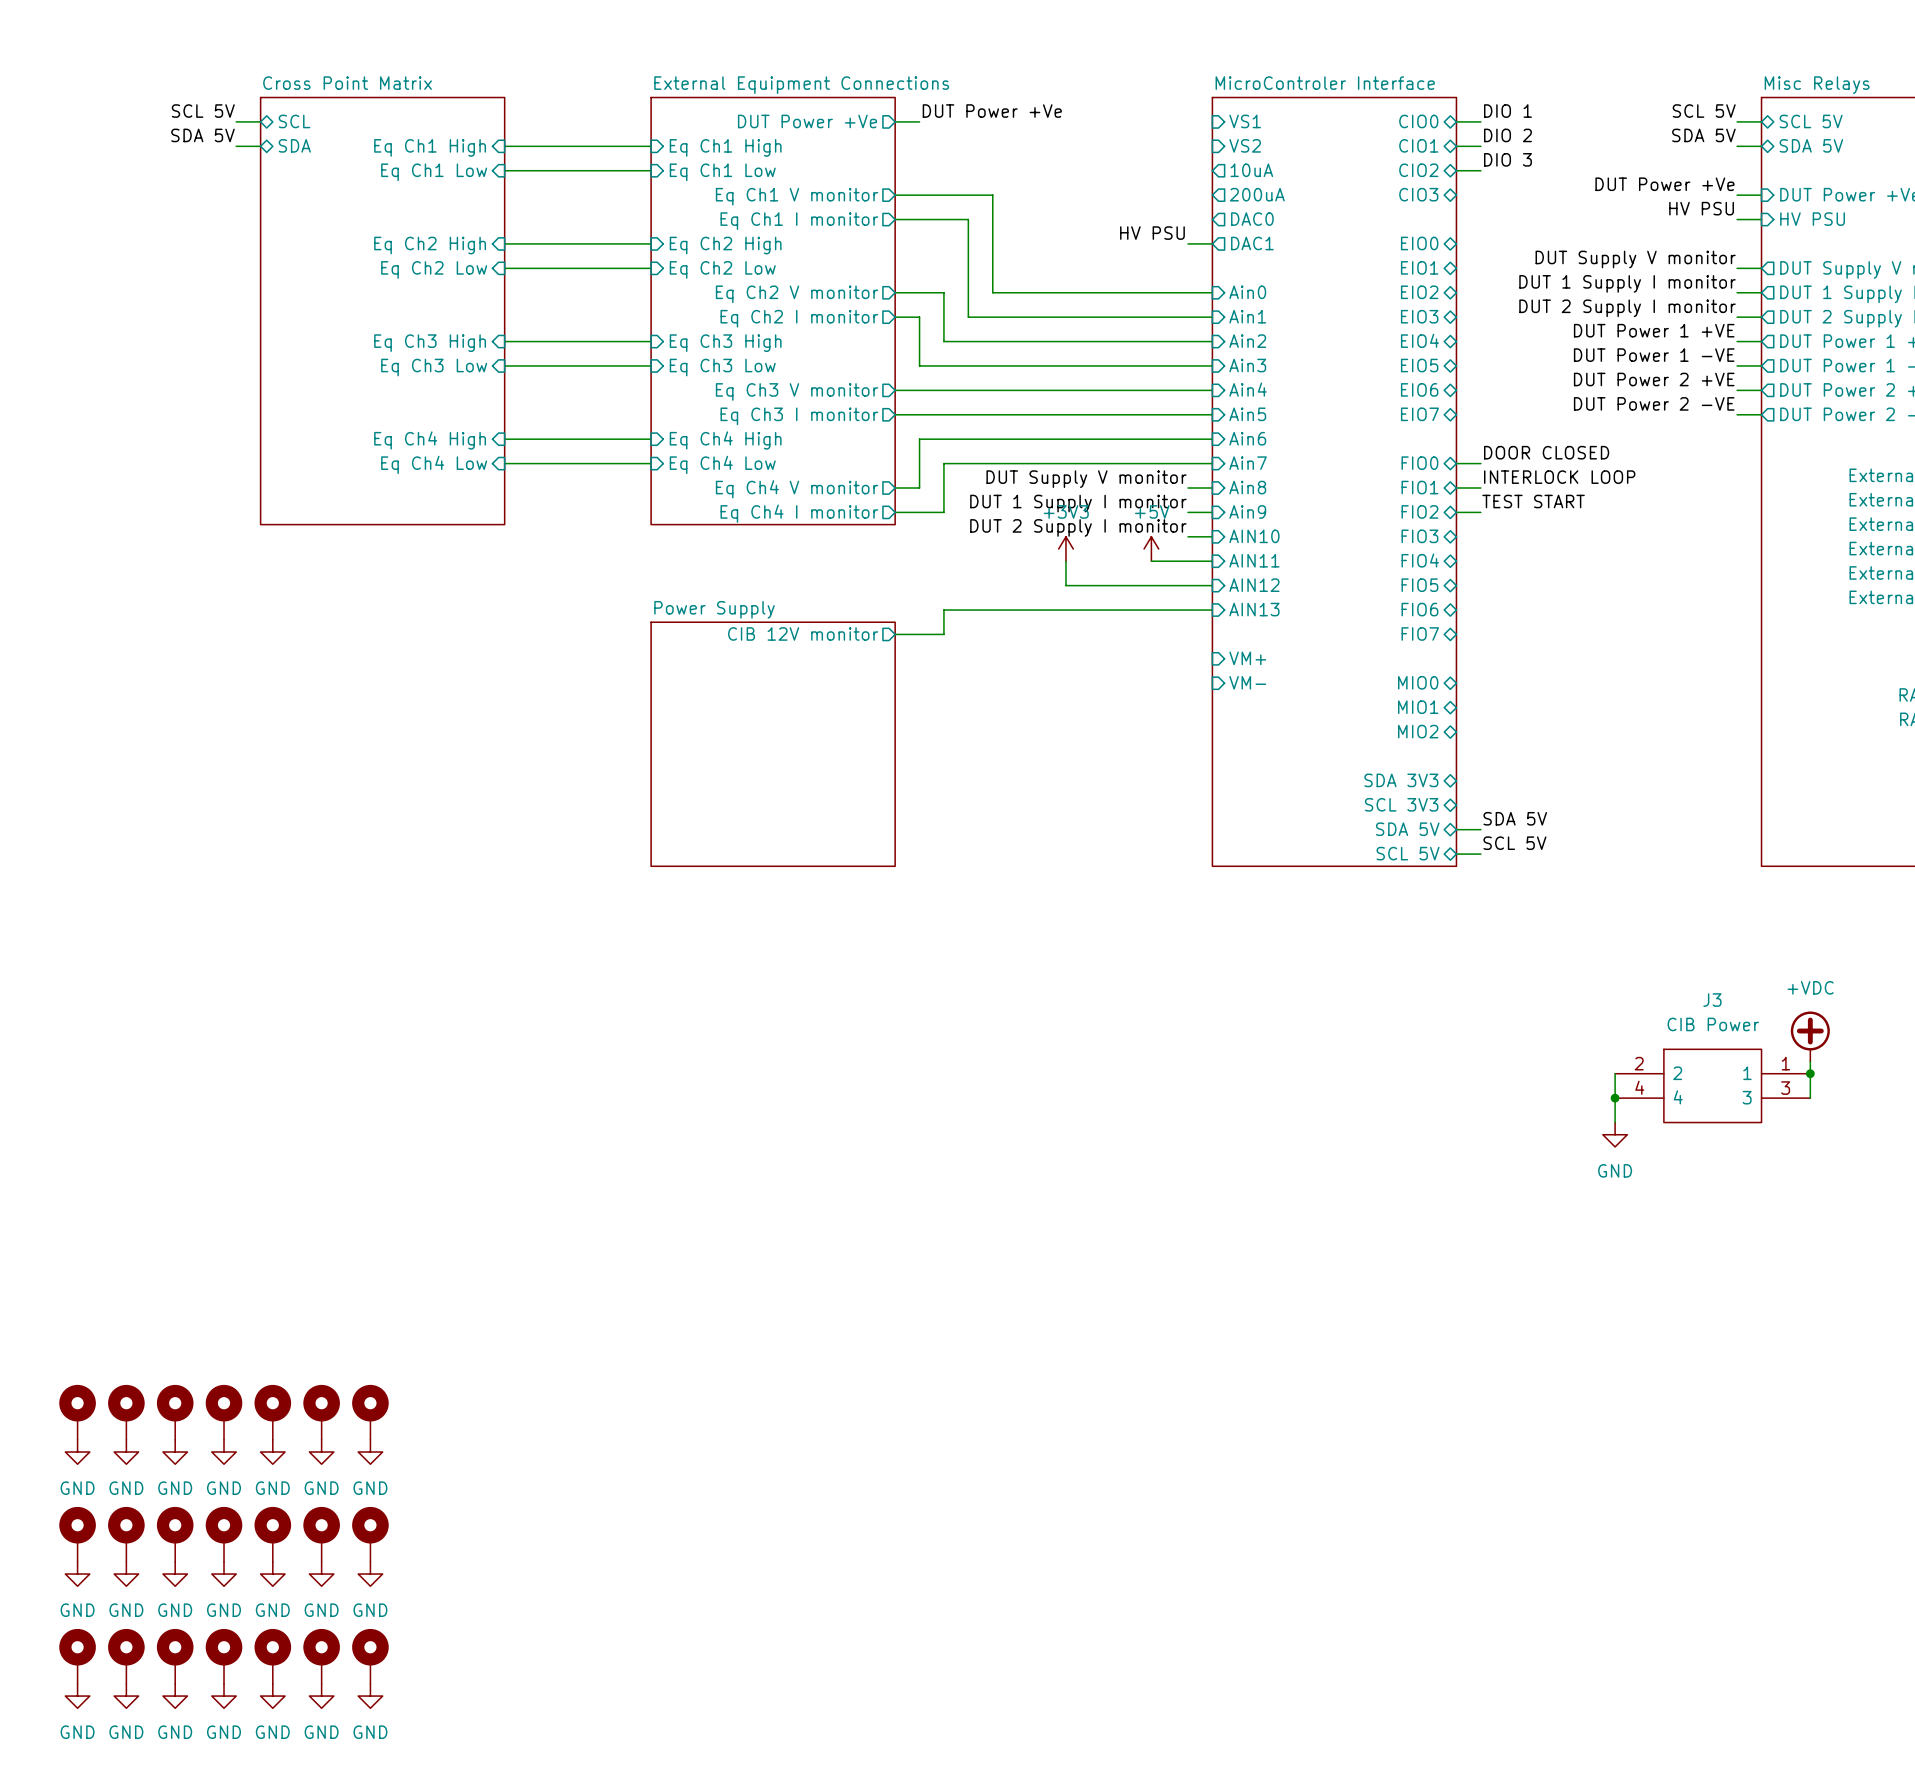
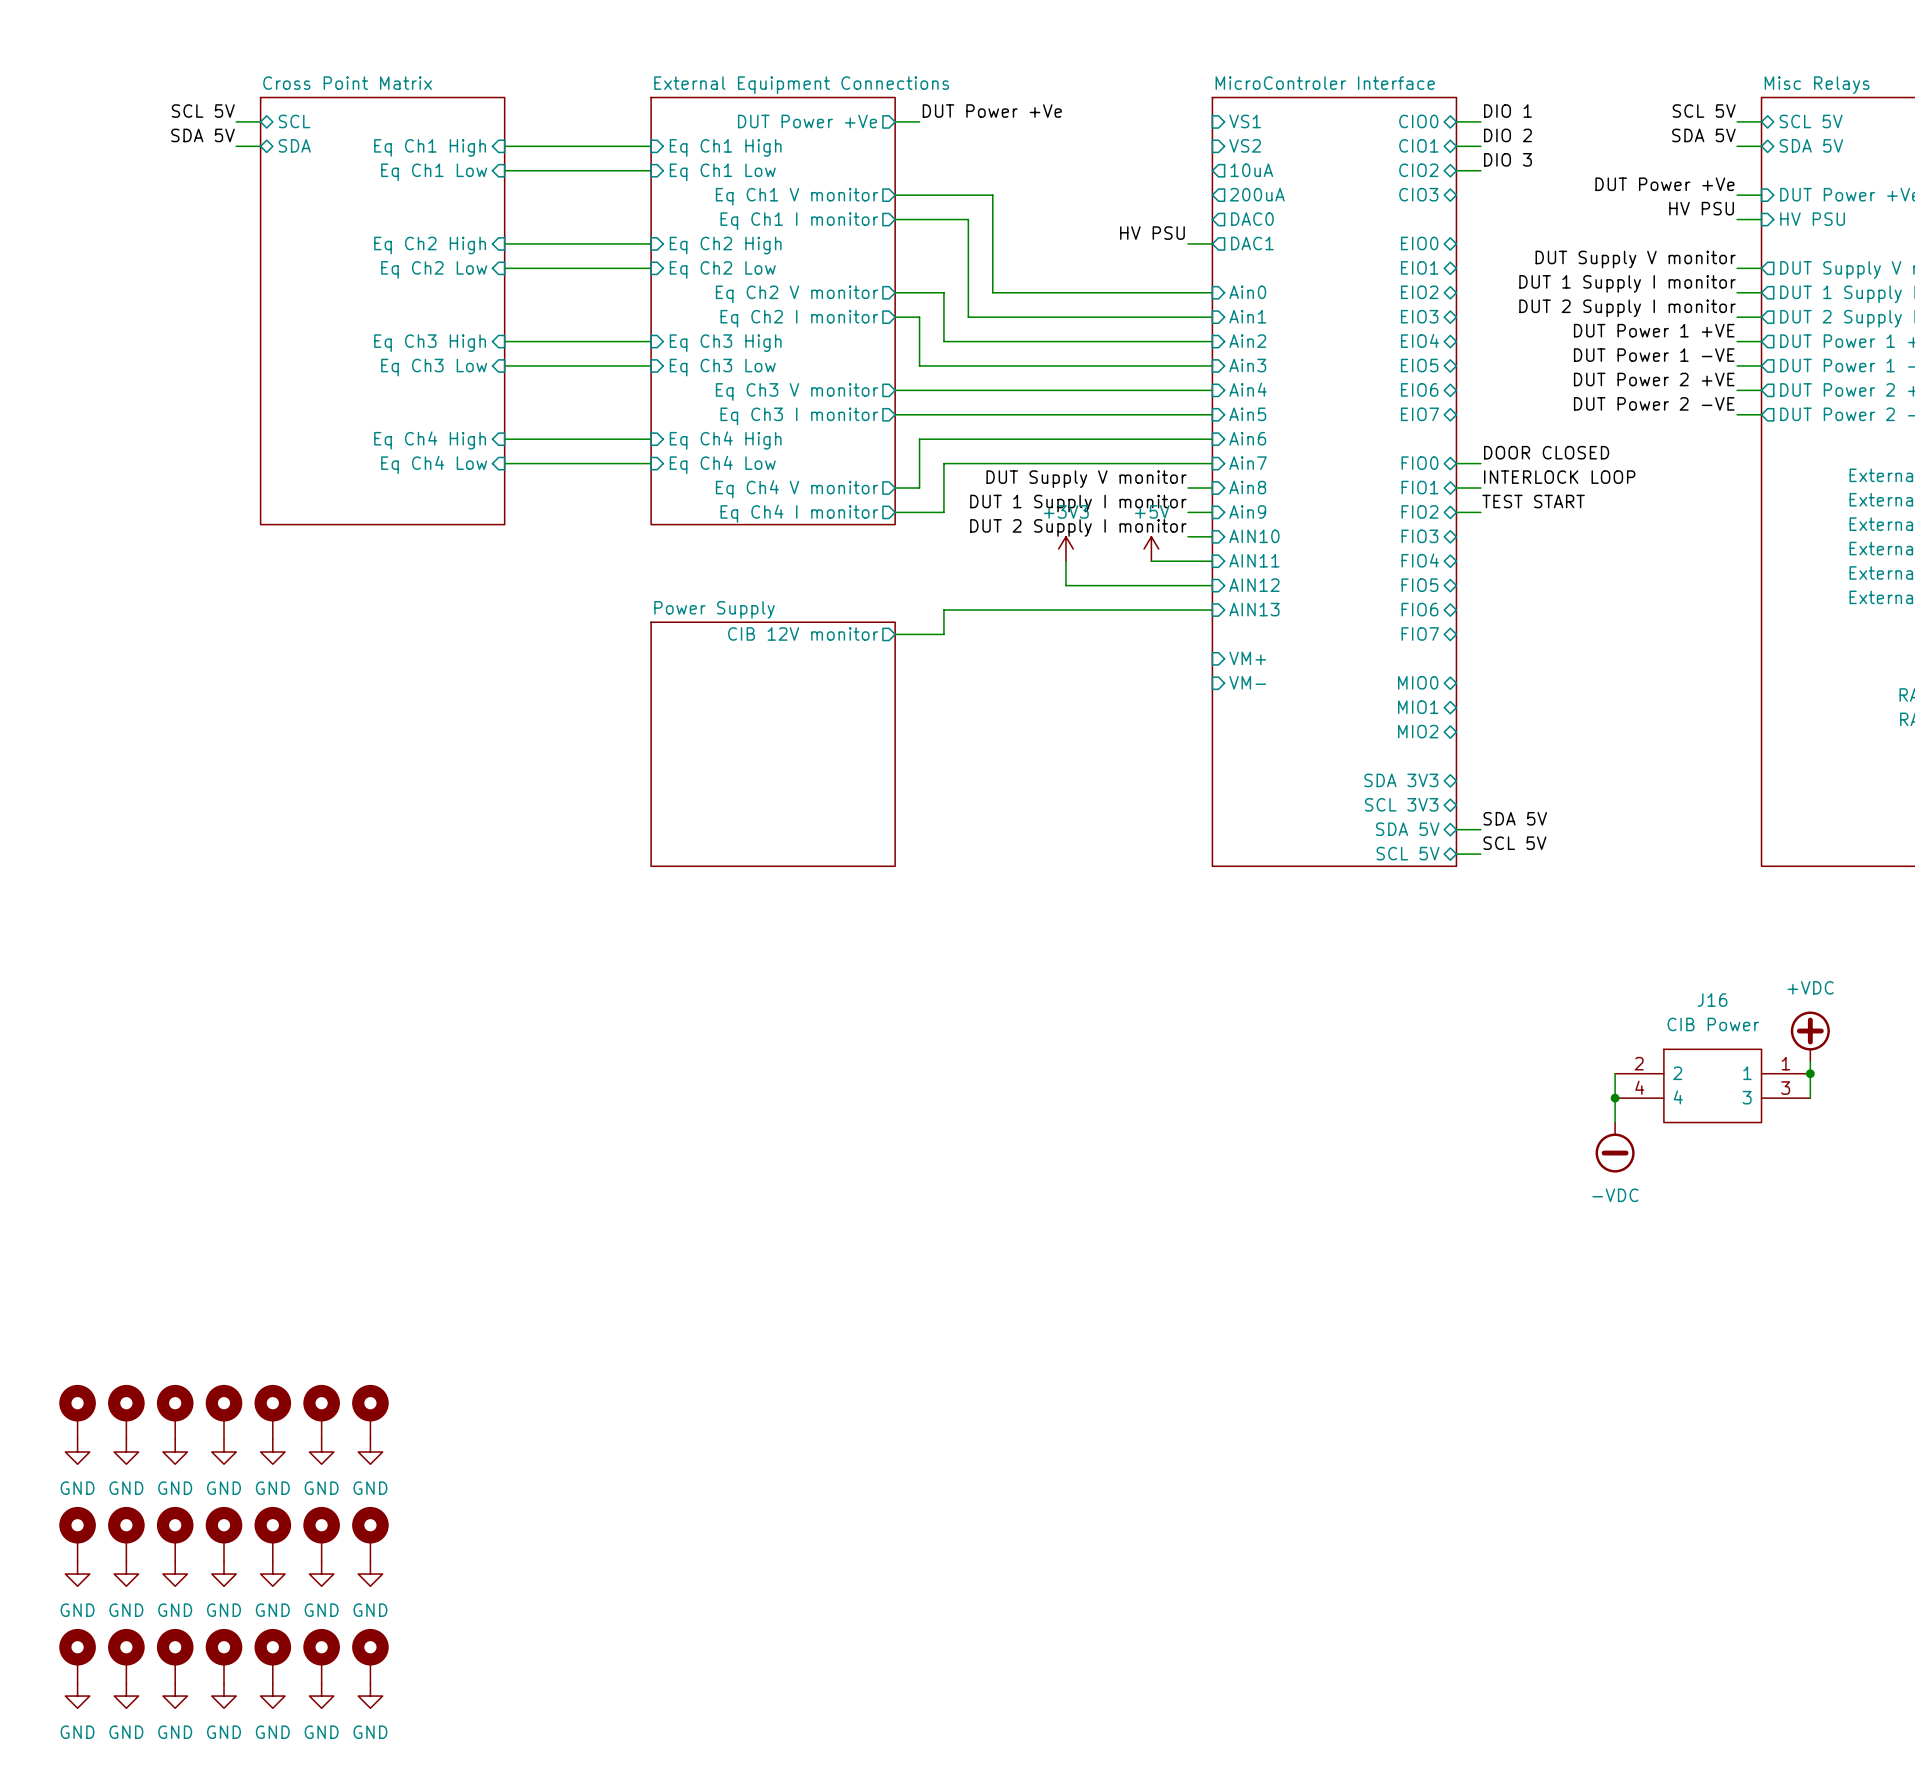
J3 name: J3 (1712, 1000) -> J16 (1712, 1000)
power symbol: GND (1615, 1134) -> none
power symbol: none -> -VDC (1615, 1147)

